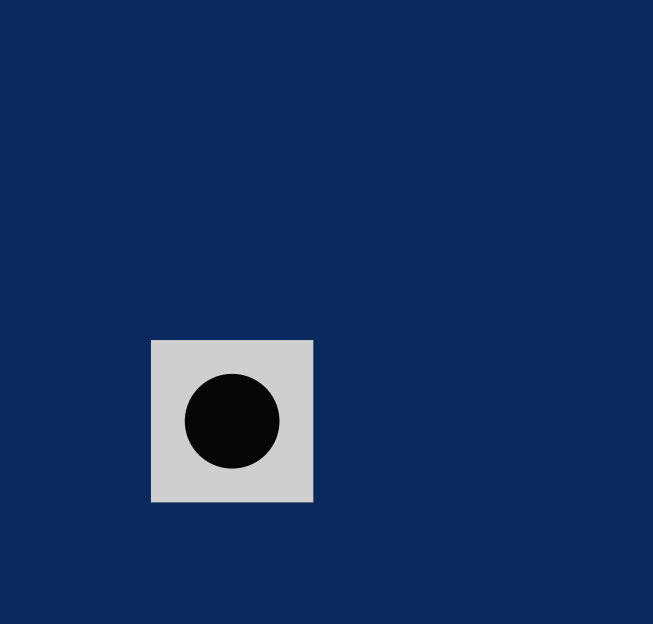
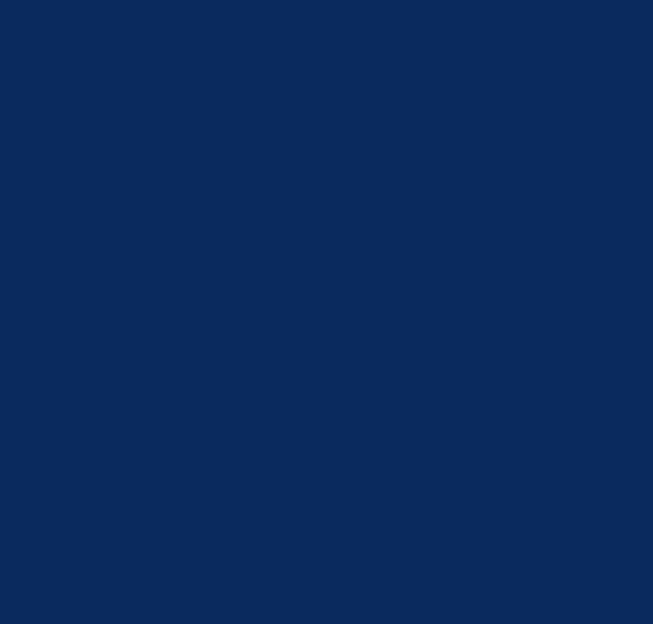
part: (232, 421) -> none

